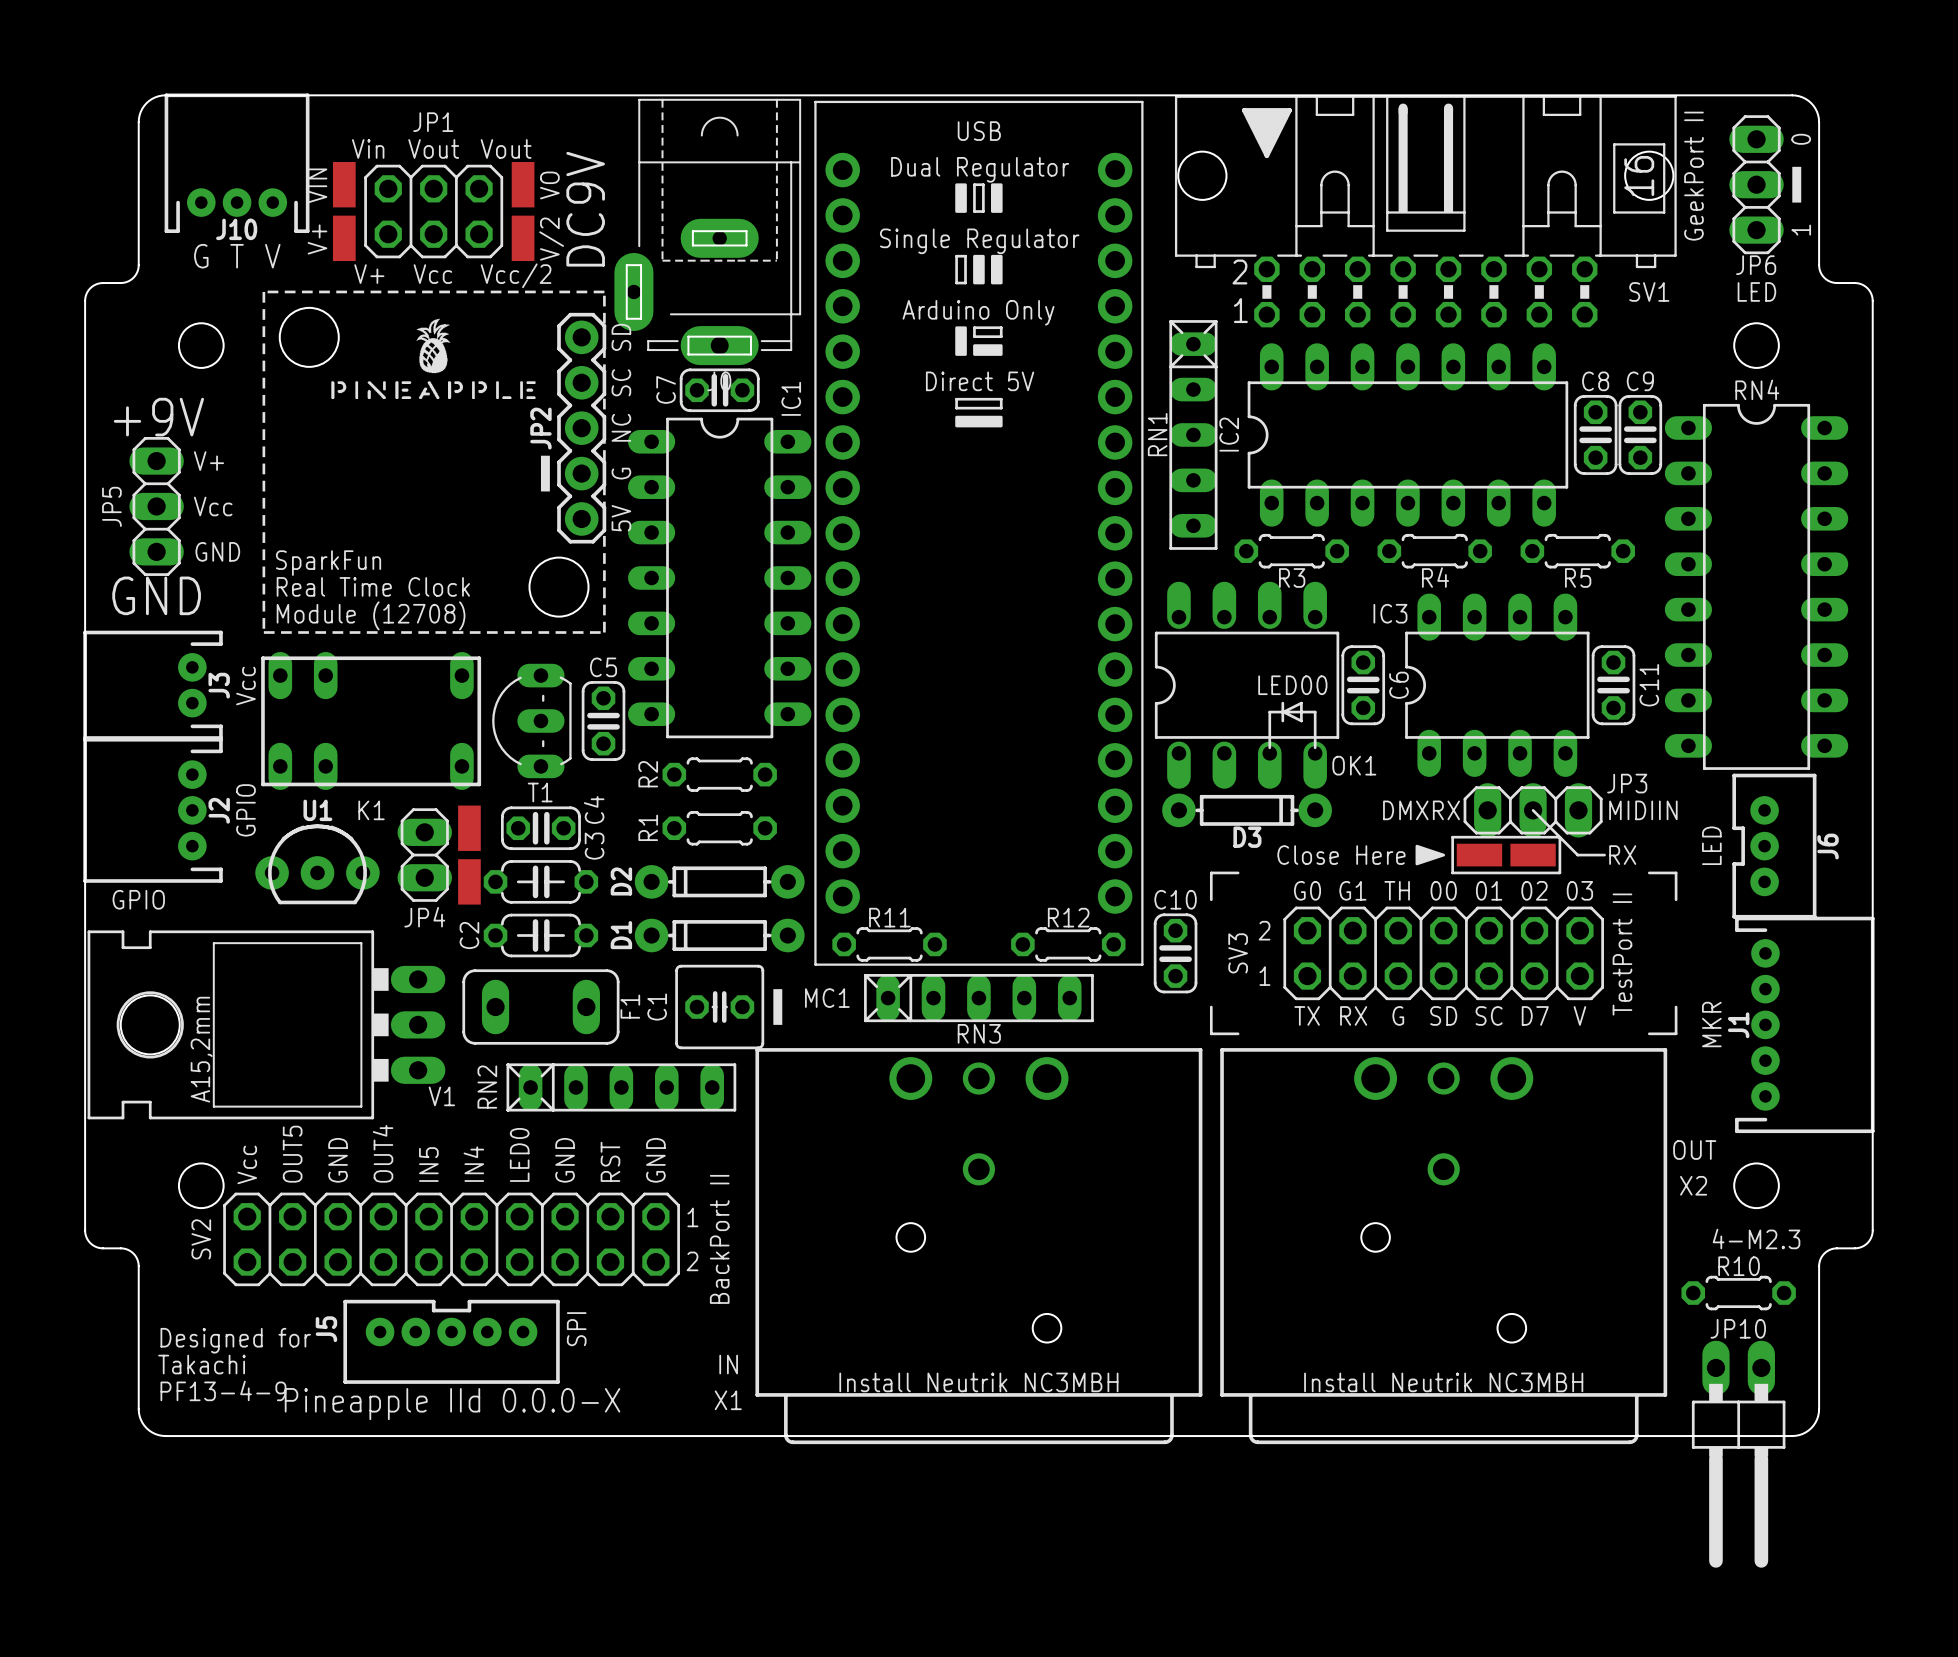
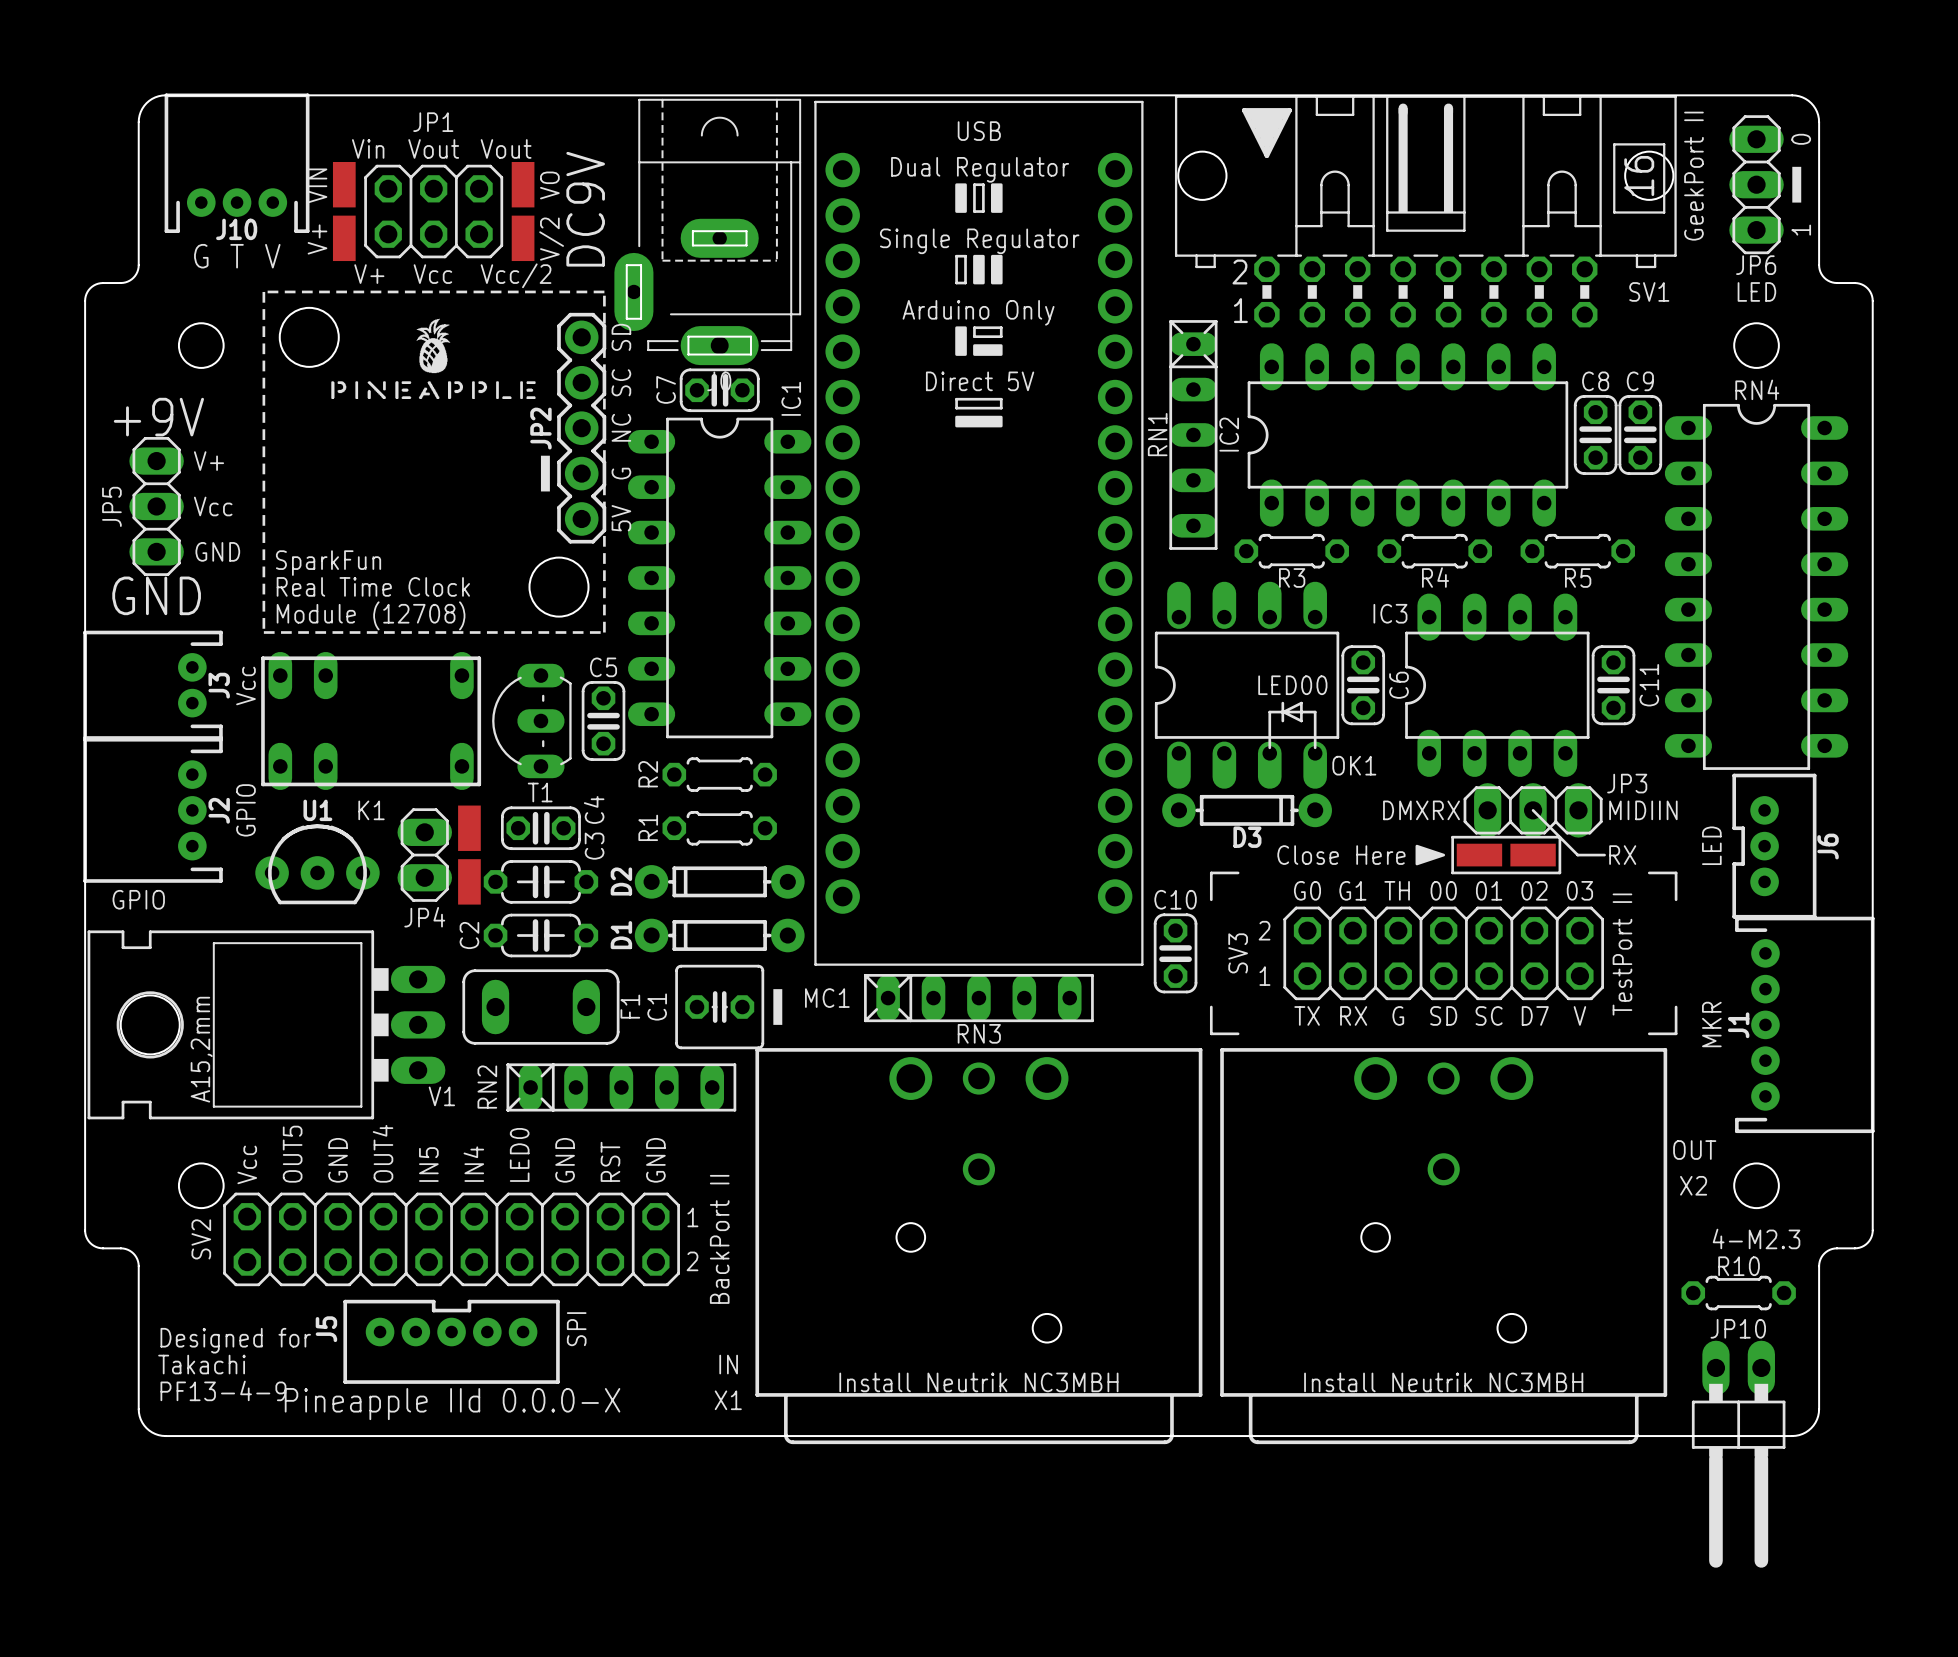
R11: (889, 944) -> none
R12: (1068, 944) -> none

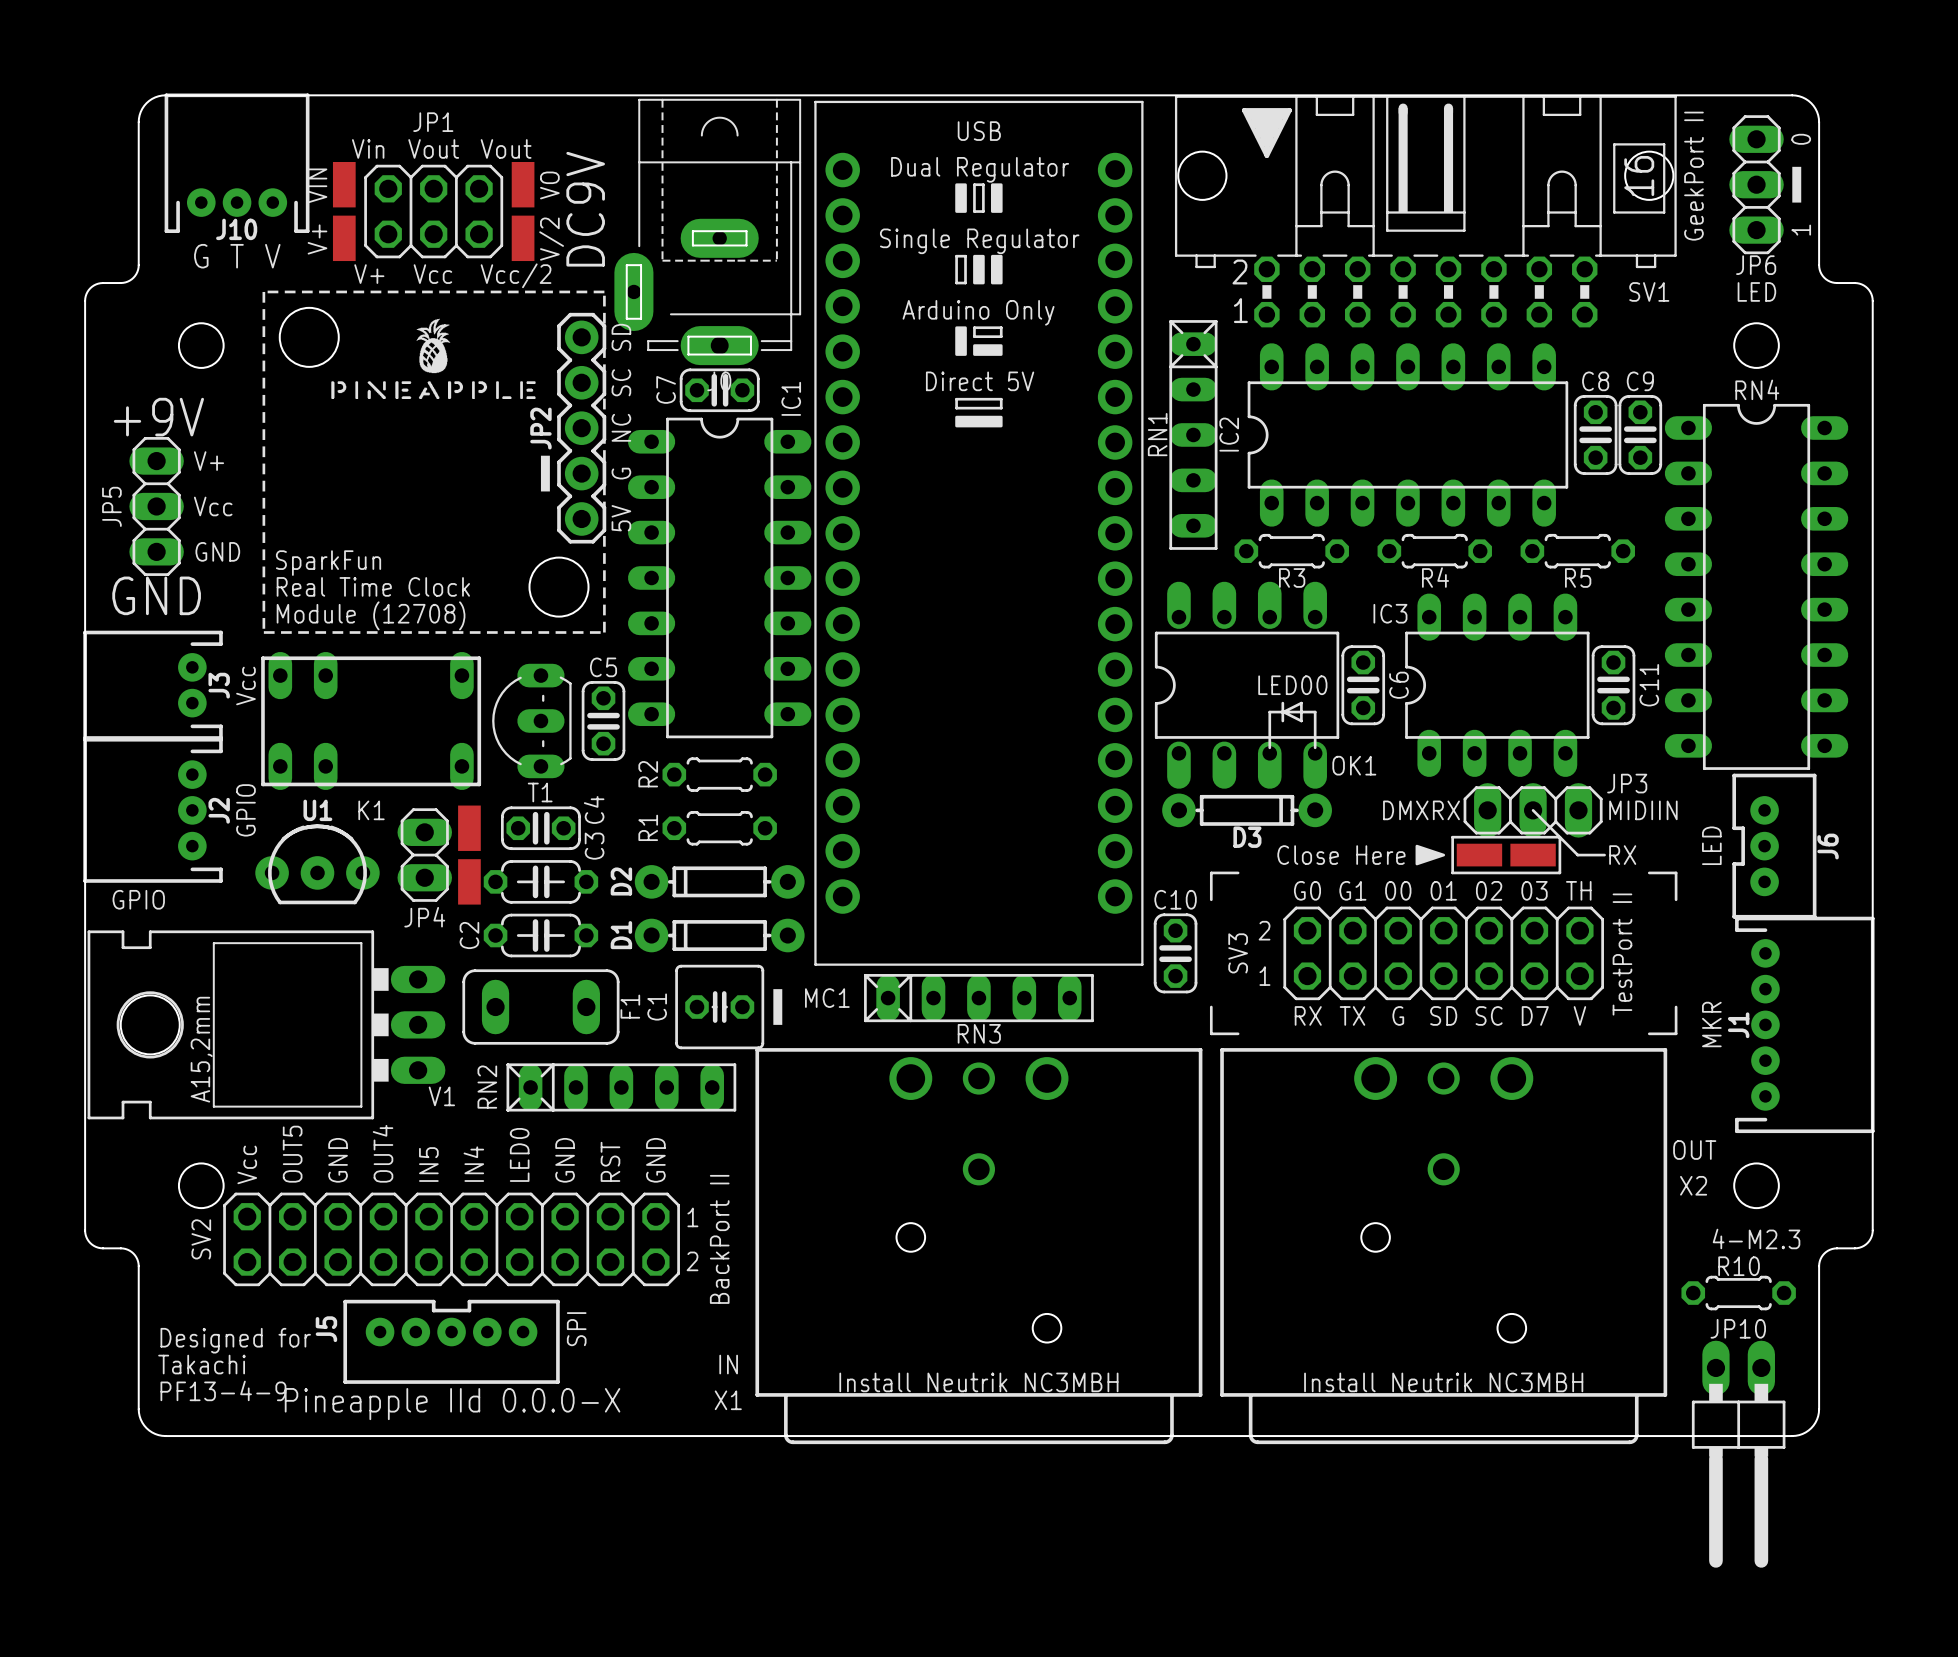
text: TH (1397, 890) -> 00 (1398, 890)
text: 00 (1443, 890) -> 01 (1443, 890)
text: 01 (1489, 890) -> 02 (1489, 890)
text: 02 (1534, 890) -> 03 (1534, 890)
text: 03 (1579, 890) -> TH (1578, 890)
text: TX (1307, 1015) -> RX (1308, 1015)
text: RX (1353, 1015) -> TX (1352, 1015)

